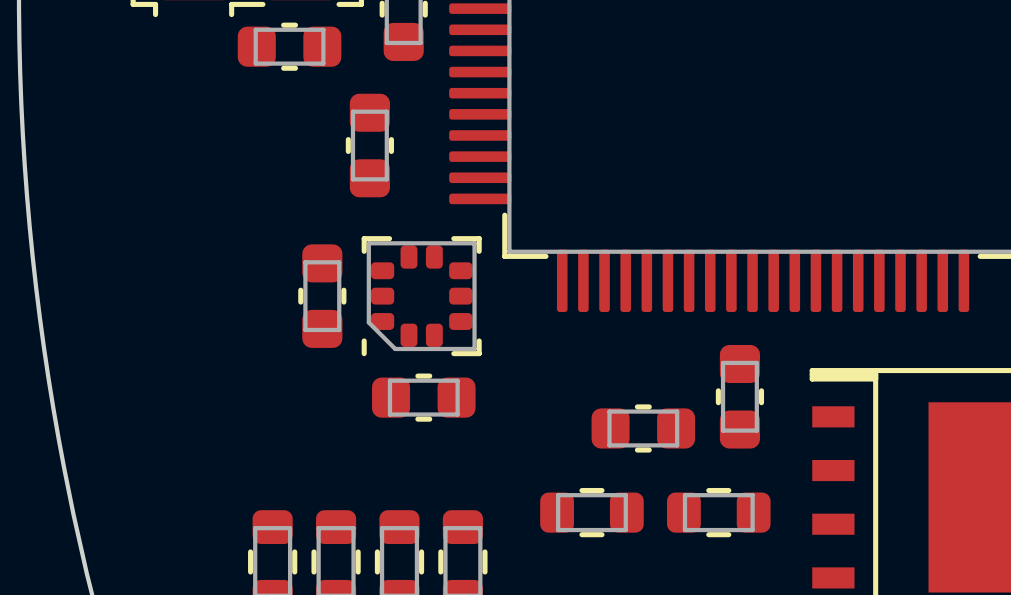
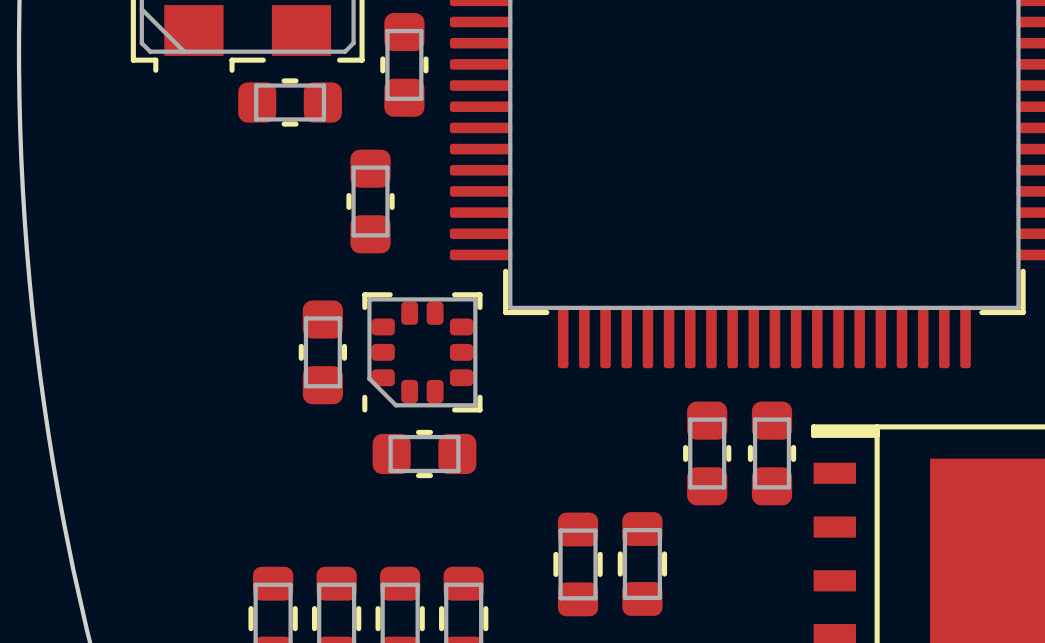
part: (739, 396) -> none
part: none -> (707, 453)
part: none -> (772, 453)
part: (643, 428) -> none
part rotation: 0° (591, 512) -> 90° clockwise (578, 564)
part rotation: 0° (718, 512) -> 90° clockwise (642, 564)
part position: (718, 512) -> (642, 564)

